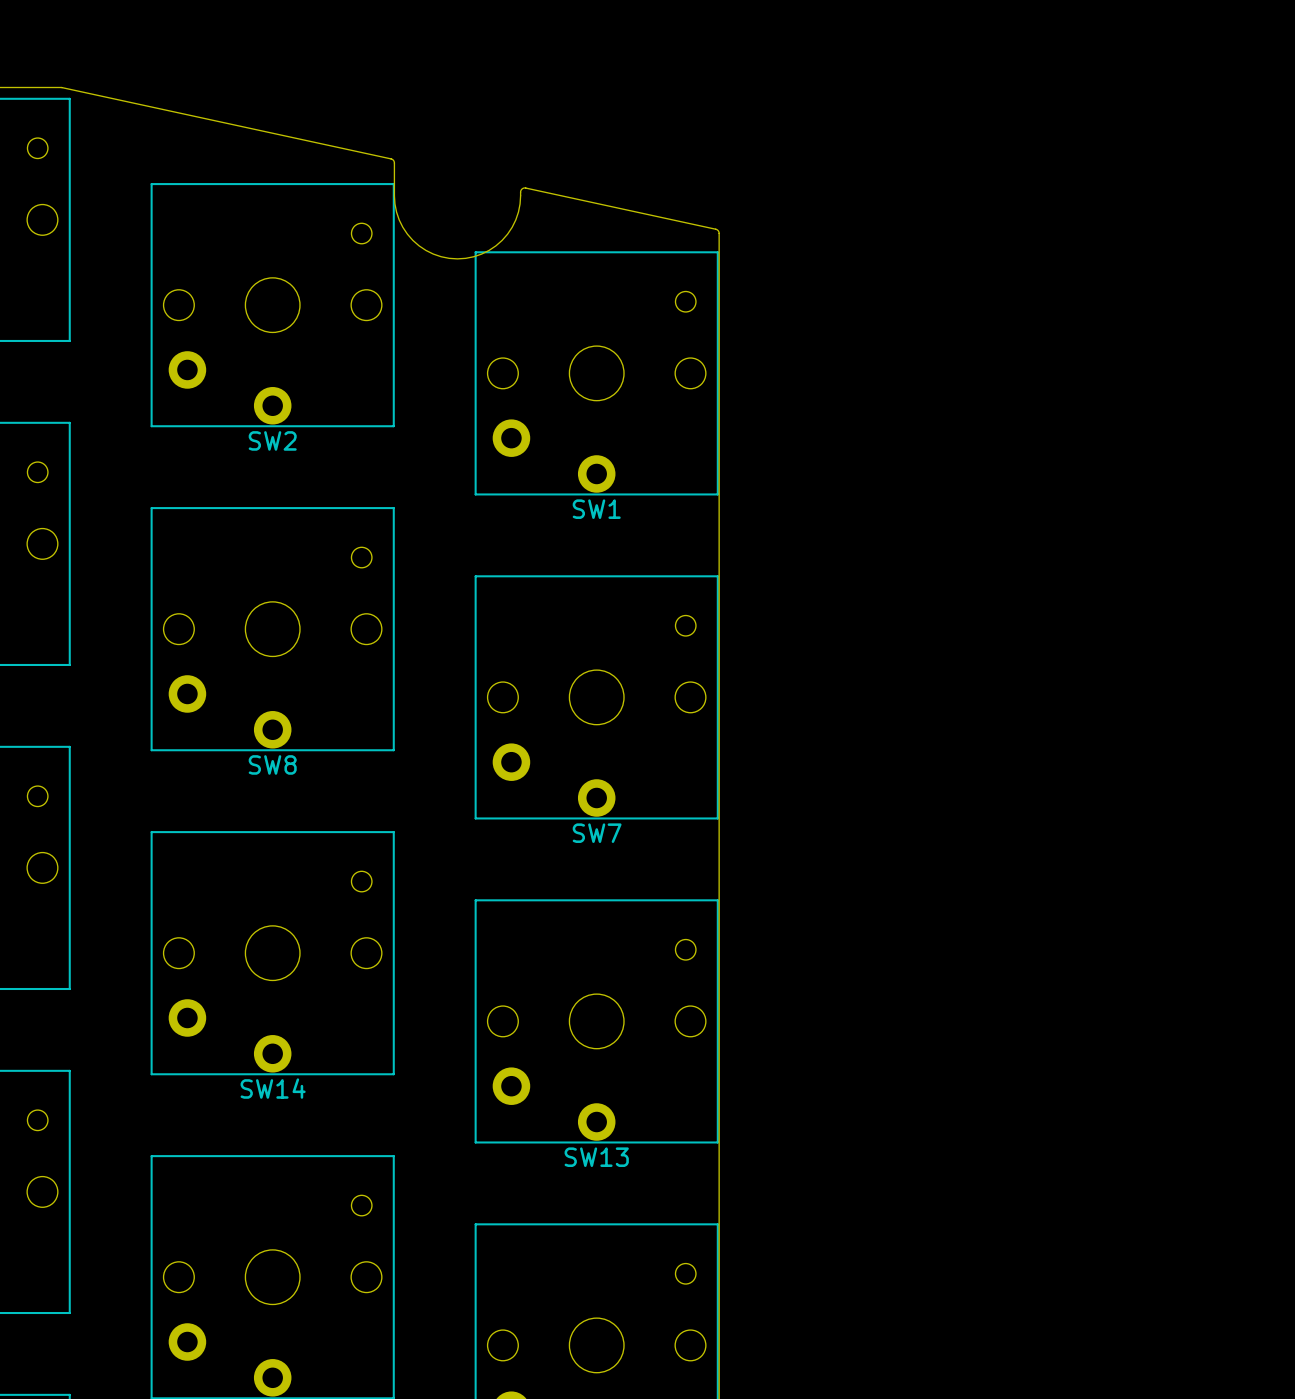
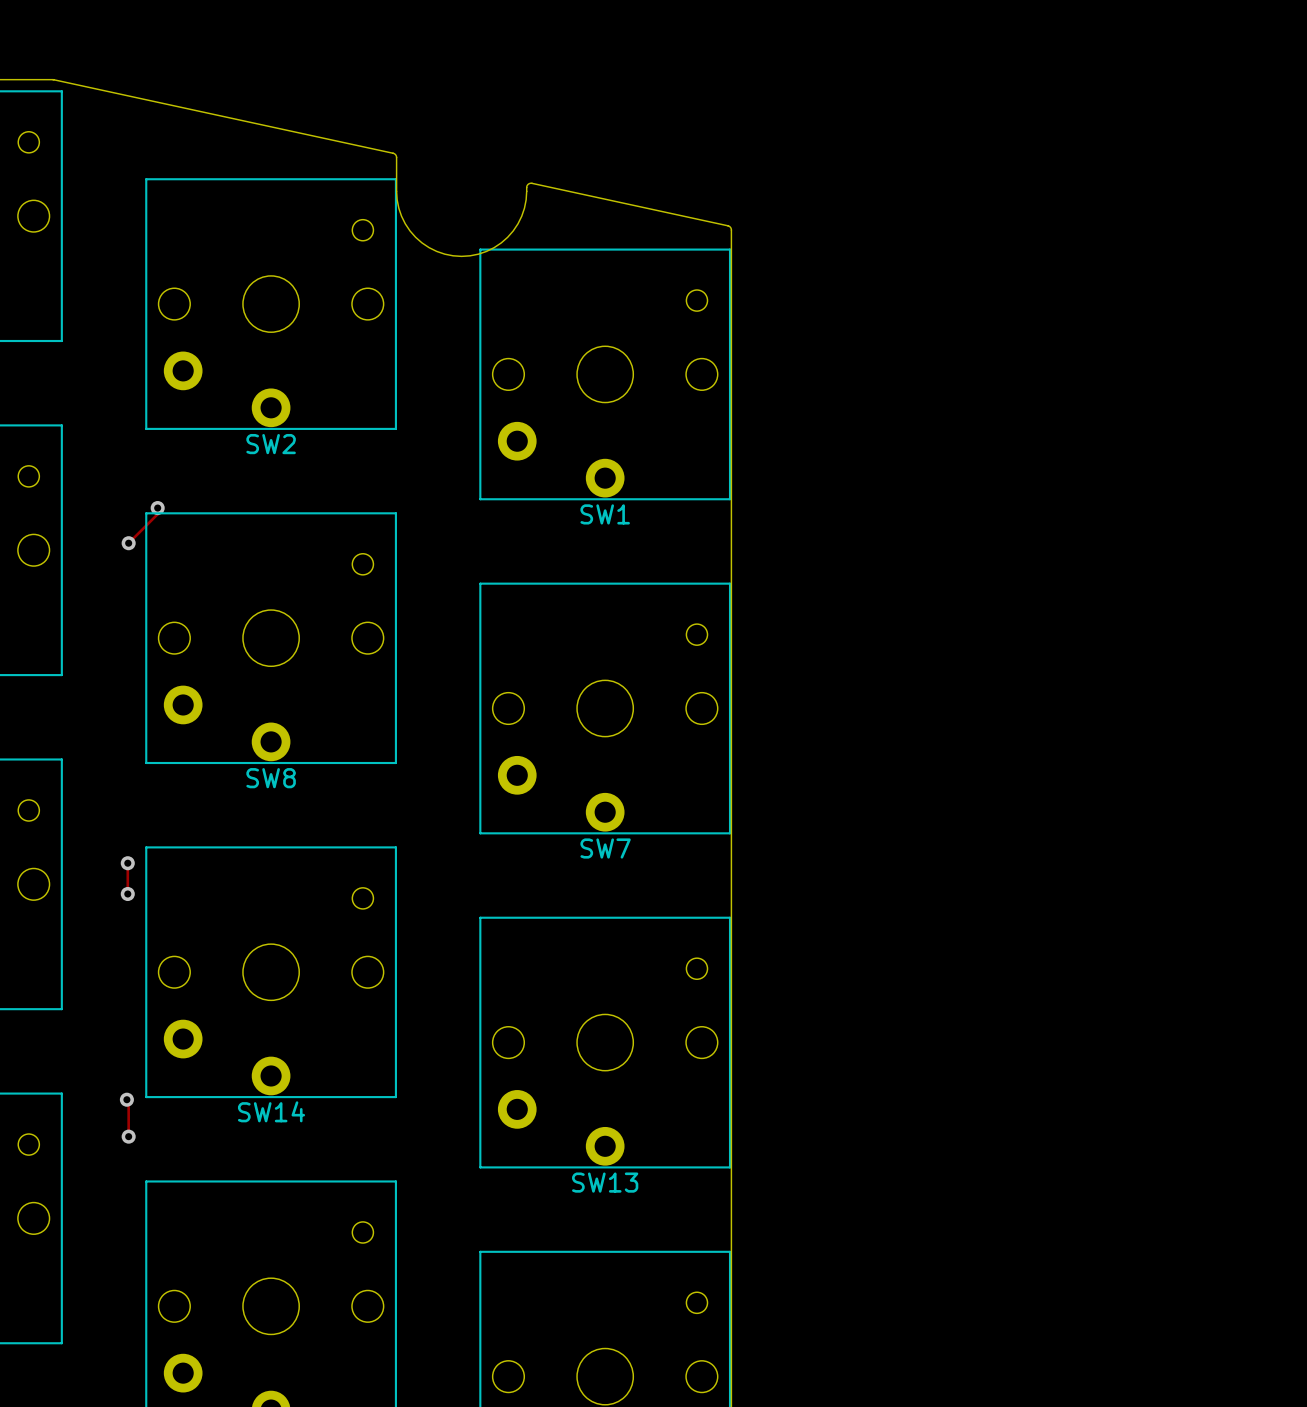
track: none -> (157, 508) (157, 514) (128, 543)
via: none -> (157, 508)
via: none -> (128, 543)
track: none -> (127, 863) (127, 893)
via: none -> (127, 863)
via: none -> (127, 893)
track: none -> (126, 1099) (128, 1101) (128, 1136)
via: none -> (126, 1099)
via: none -> (128, 1136)

